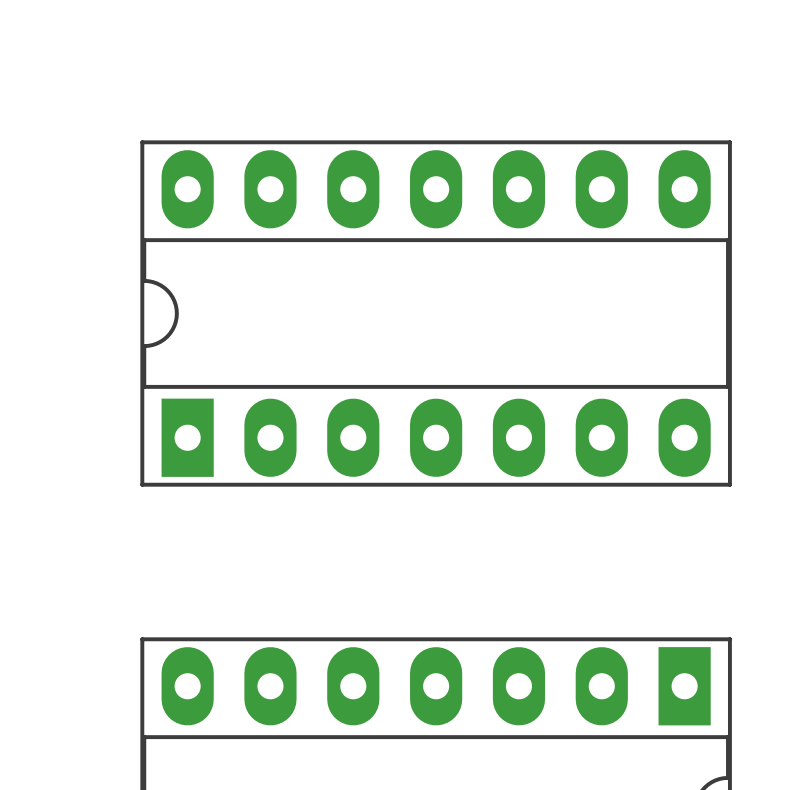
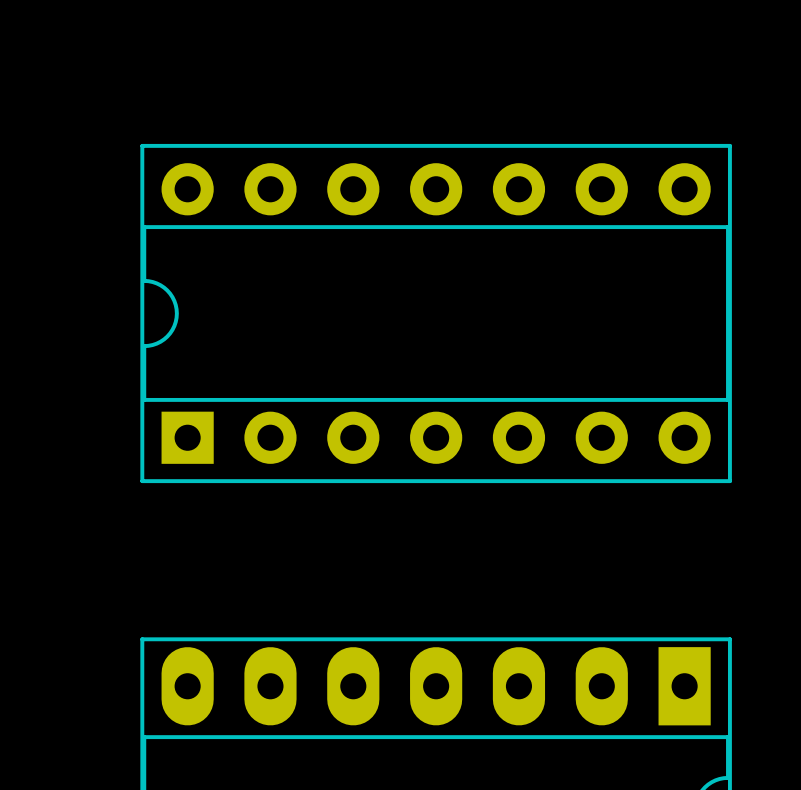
part footprint: [140, 140, 732, 487] -> [140, 143, 732, 484]

